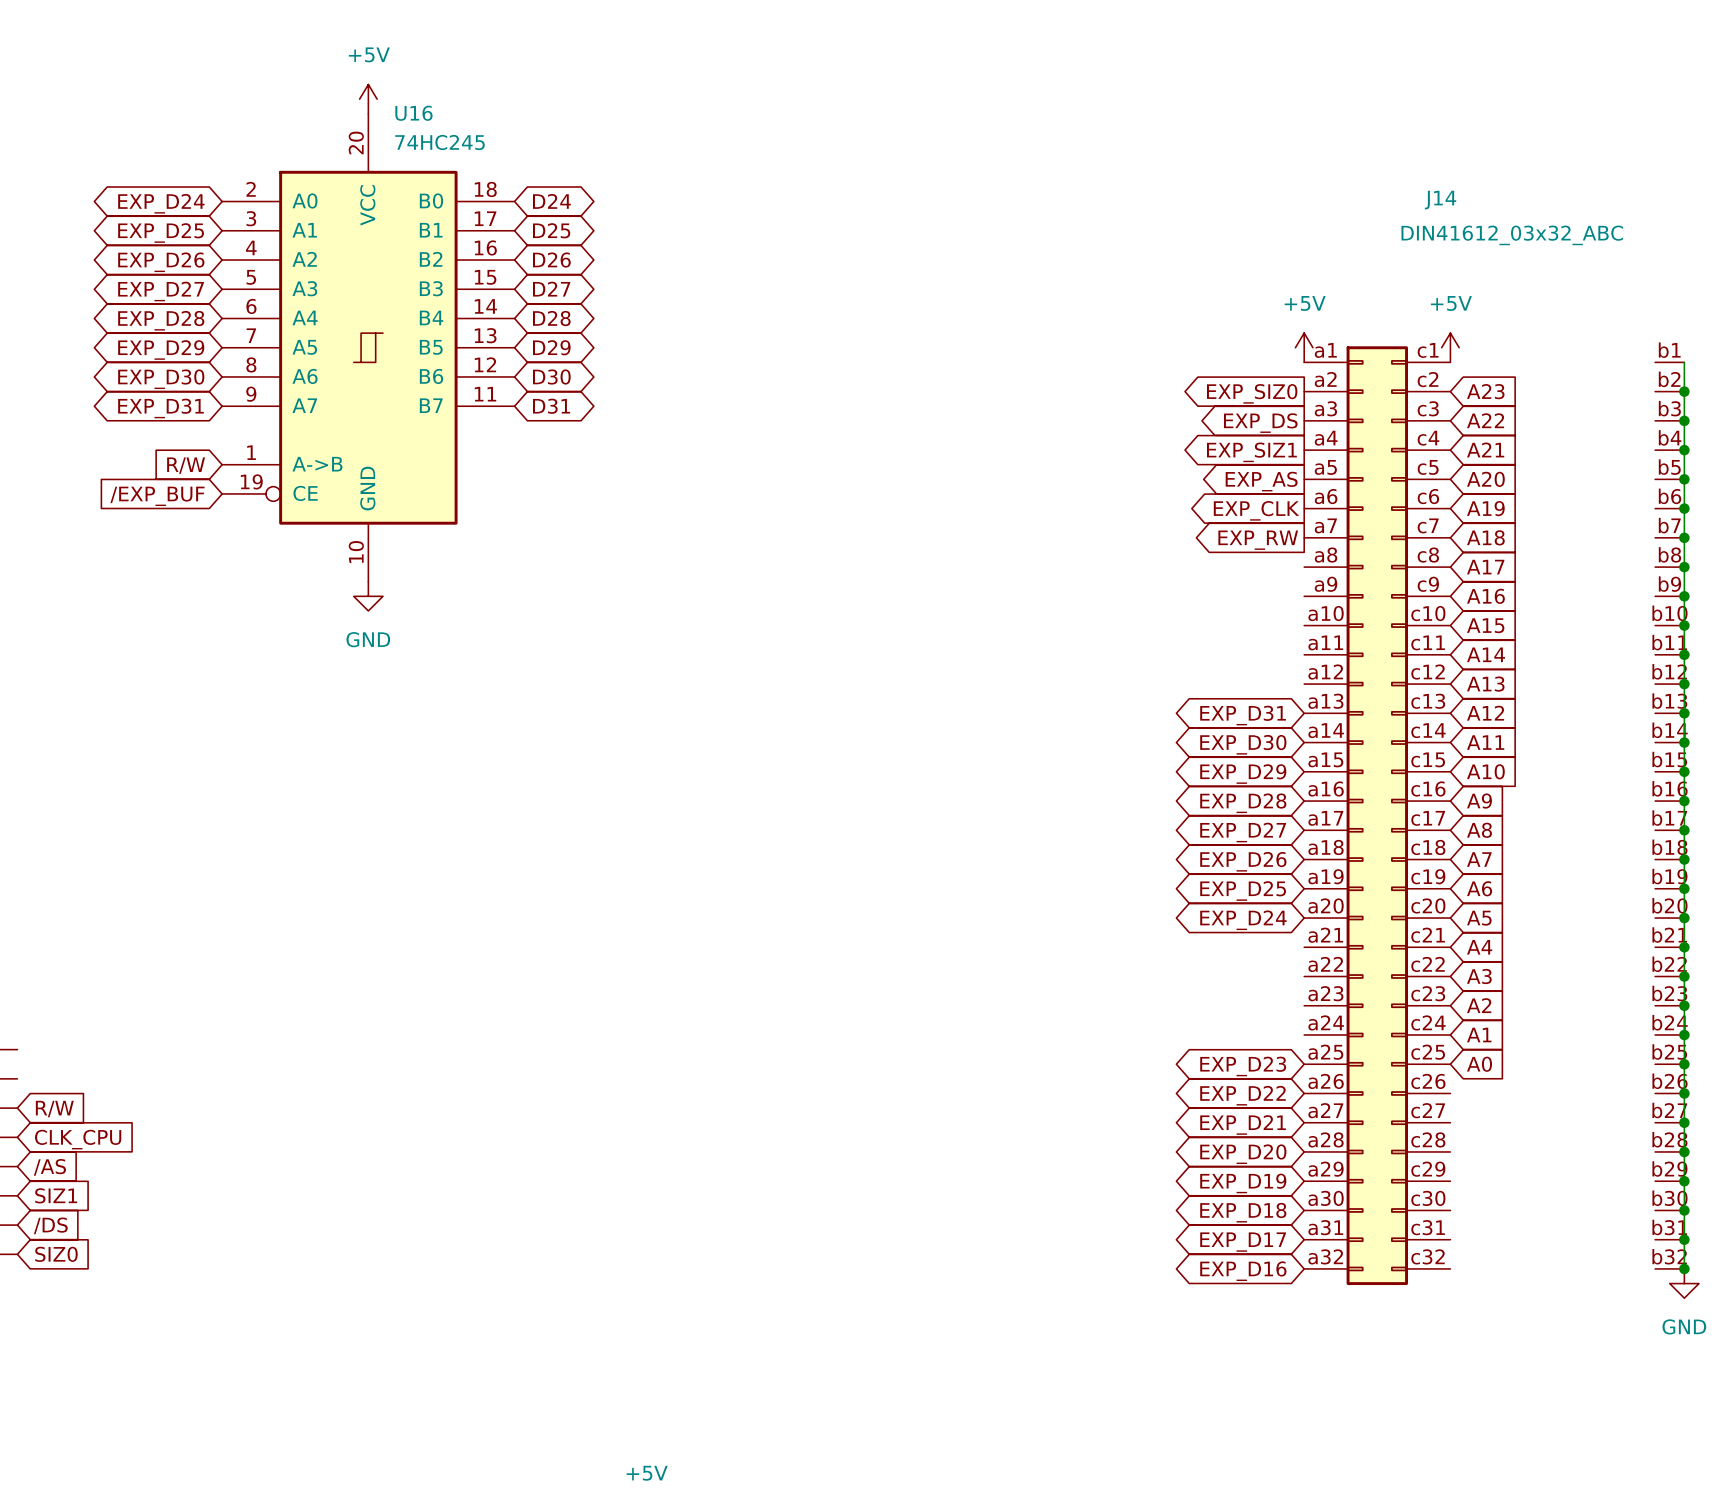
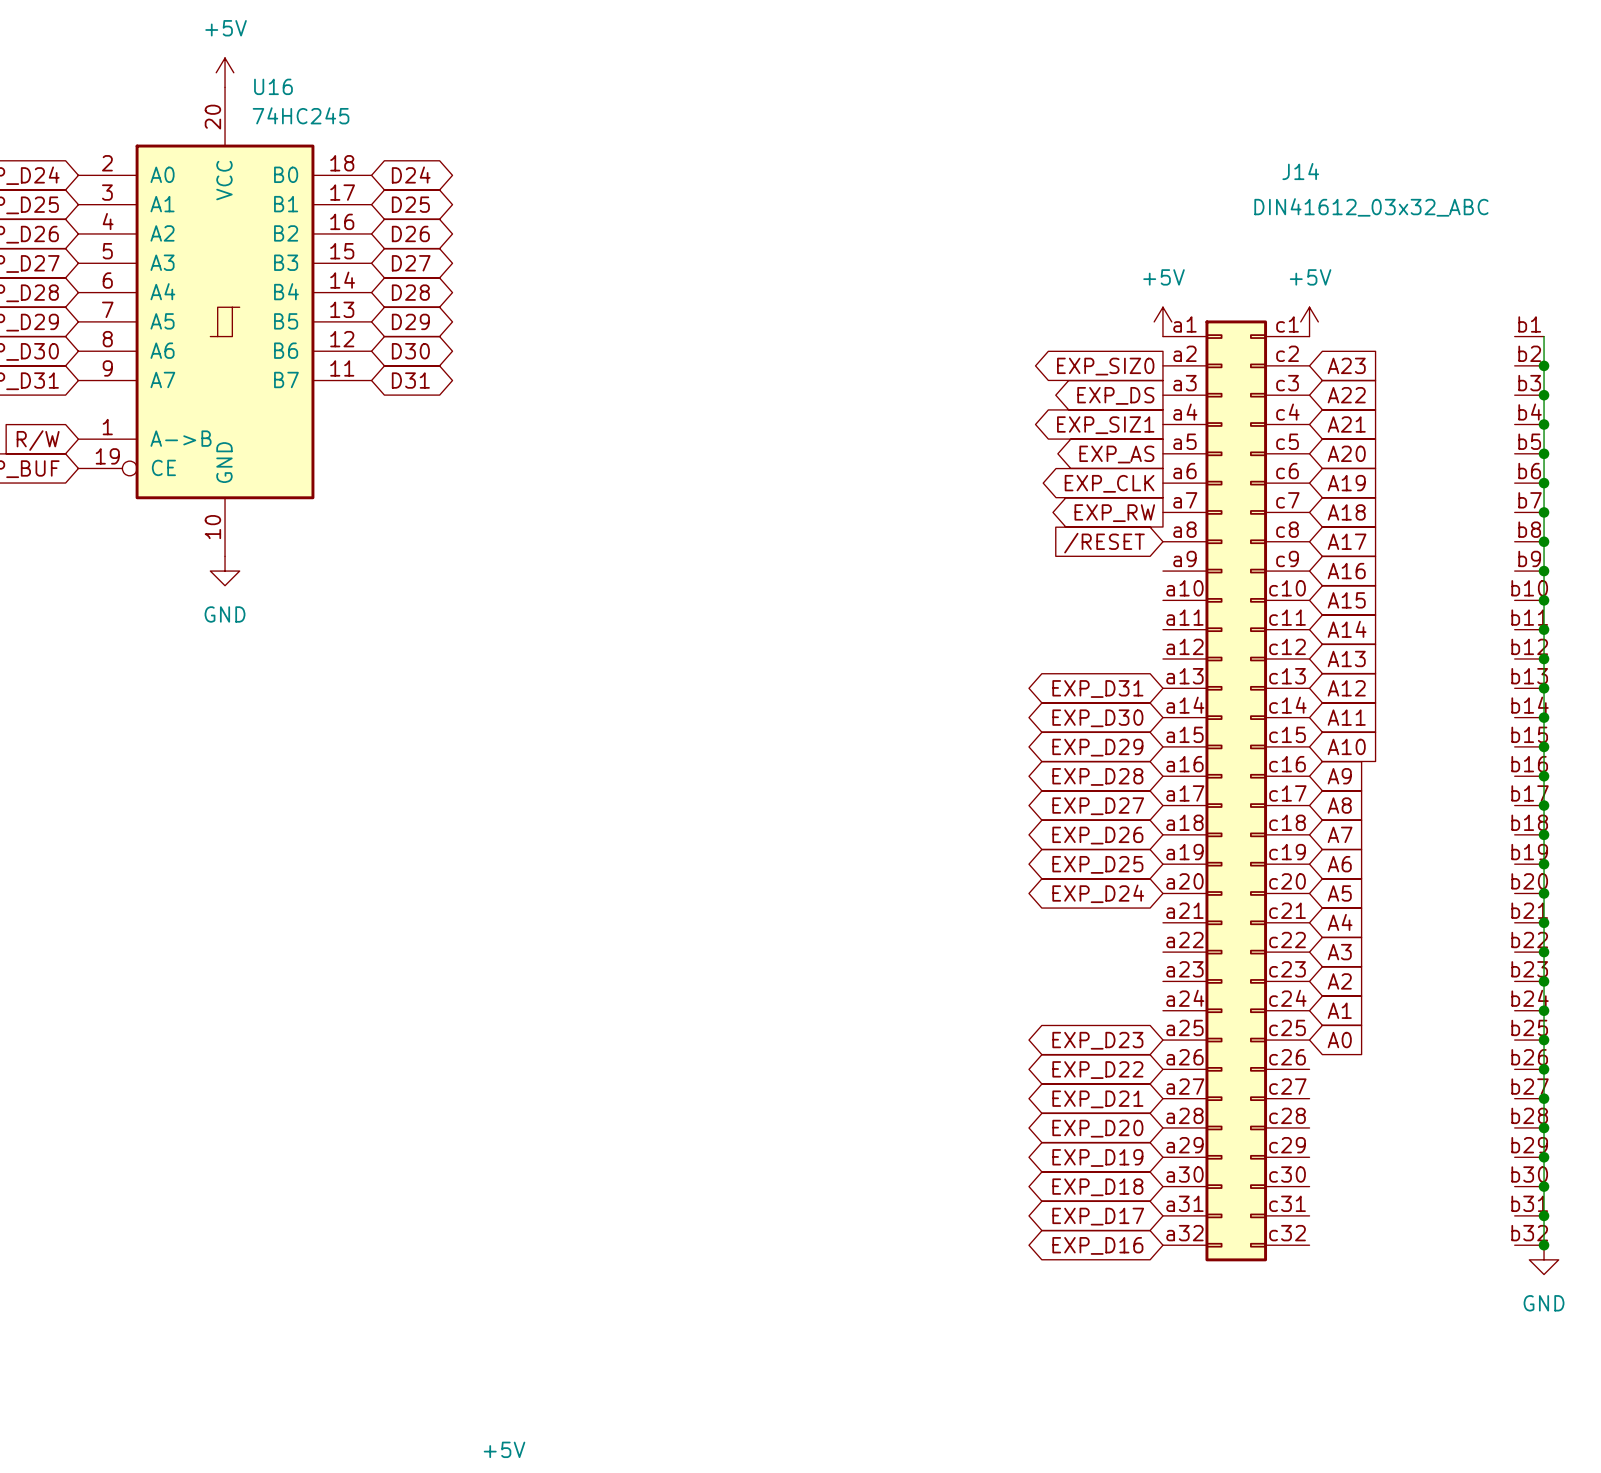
global label: none -> /RESET (1104, 543)

